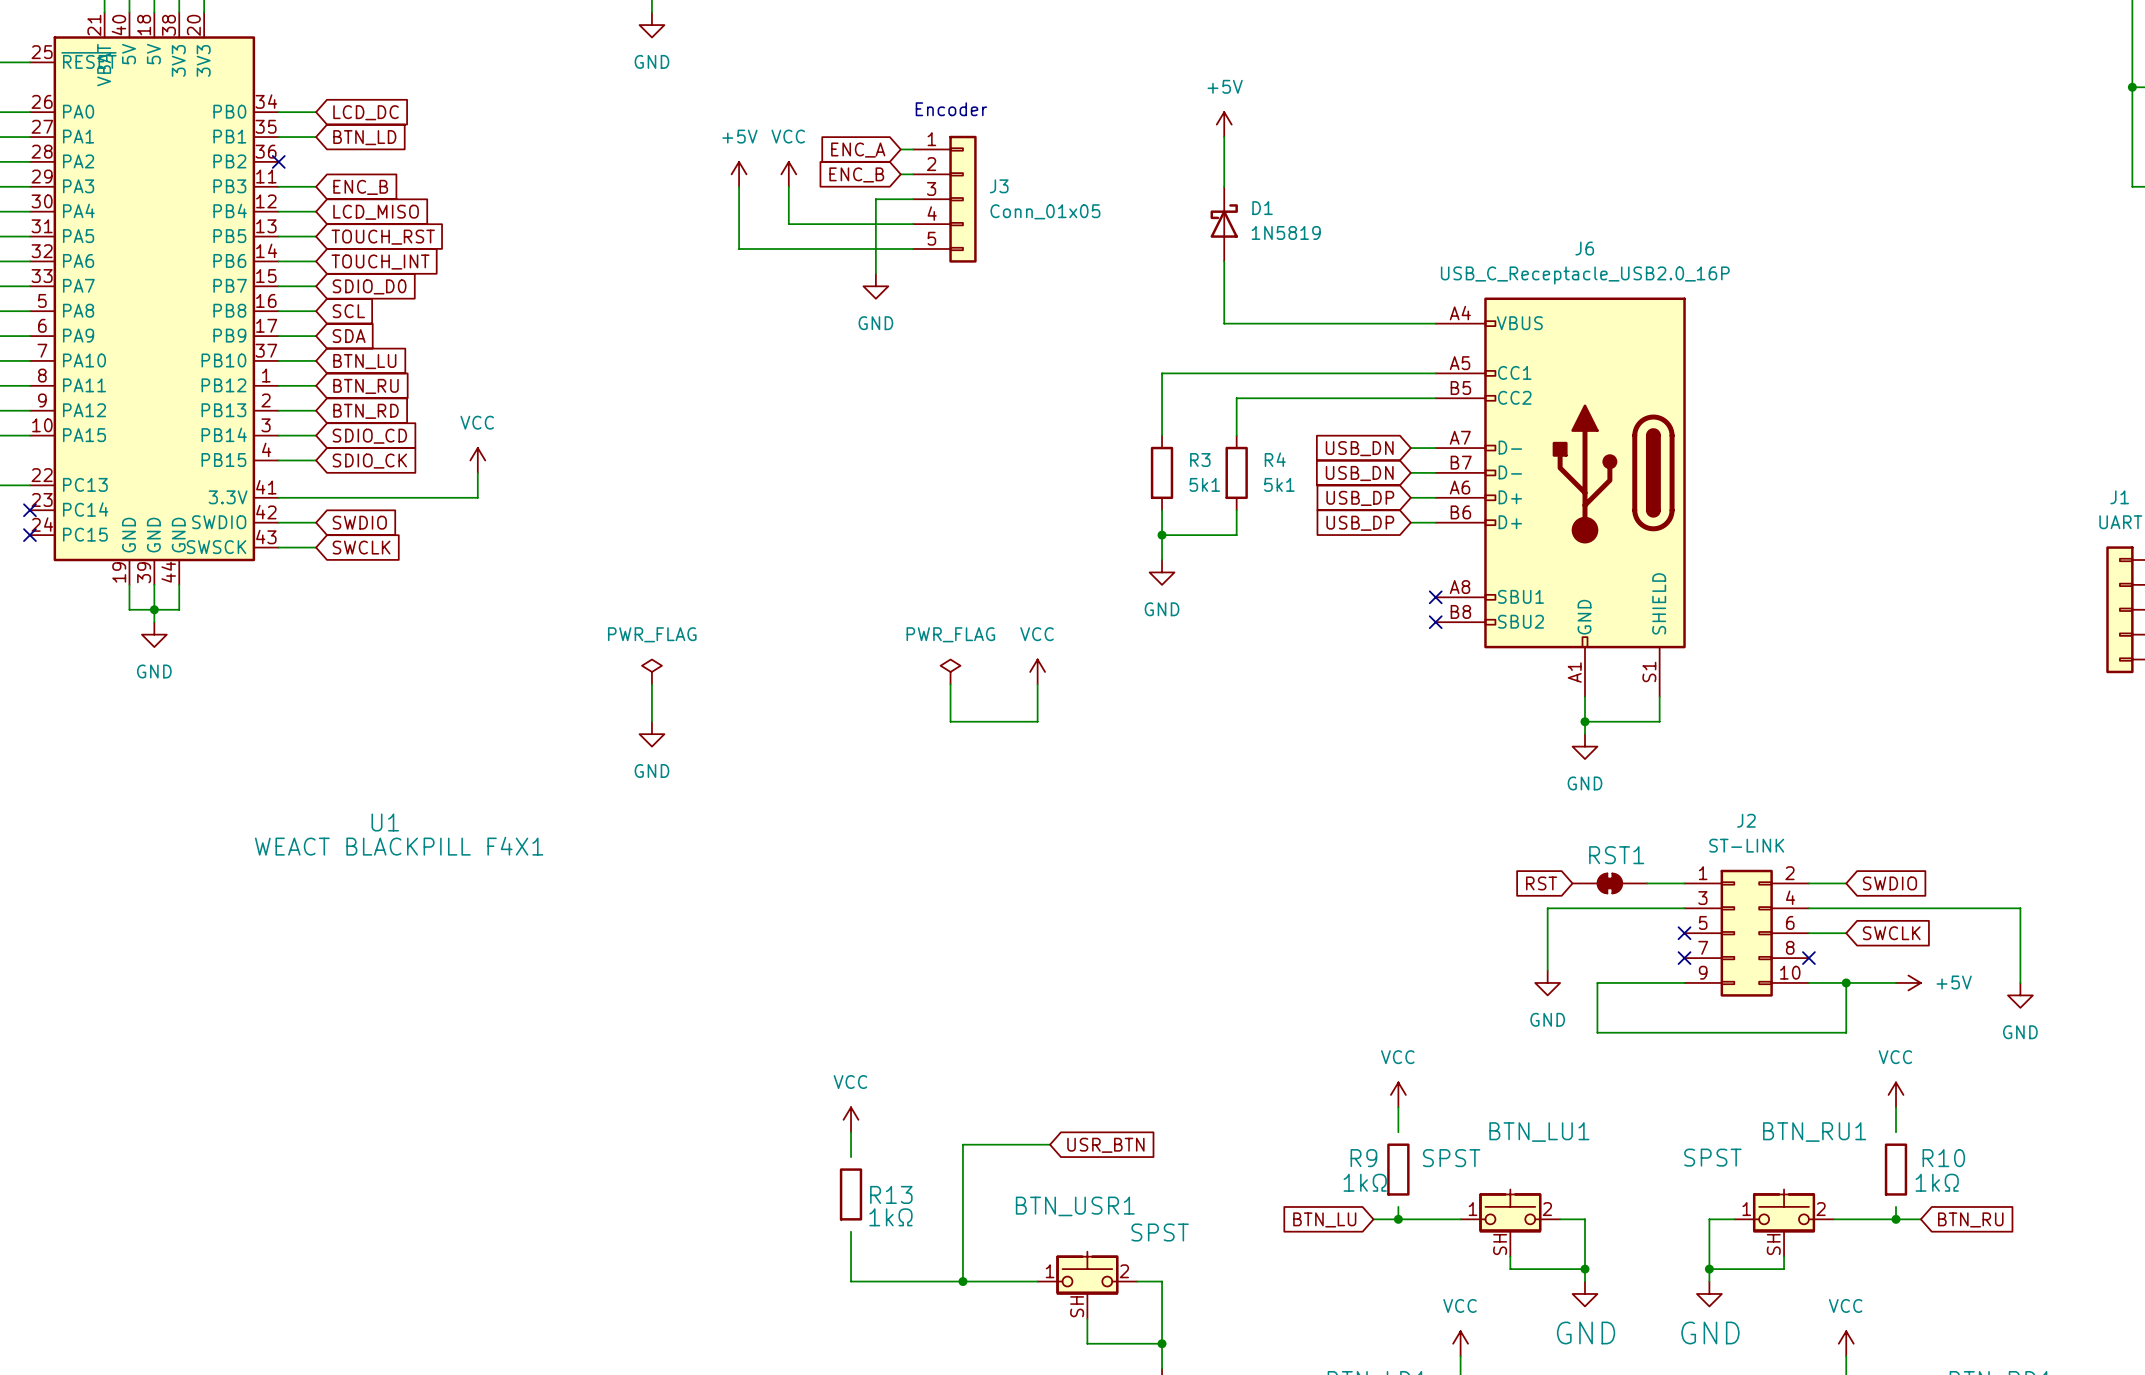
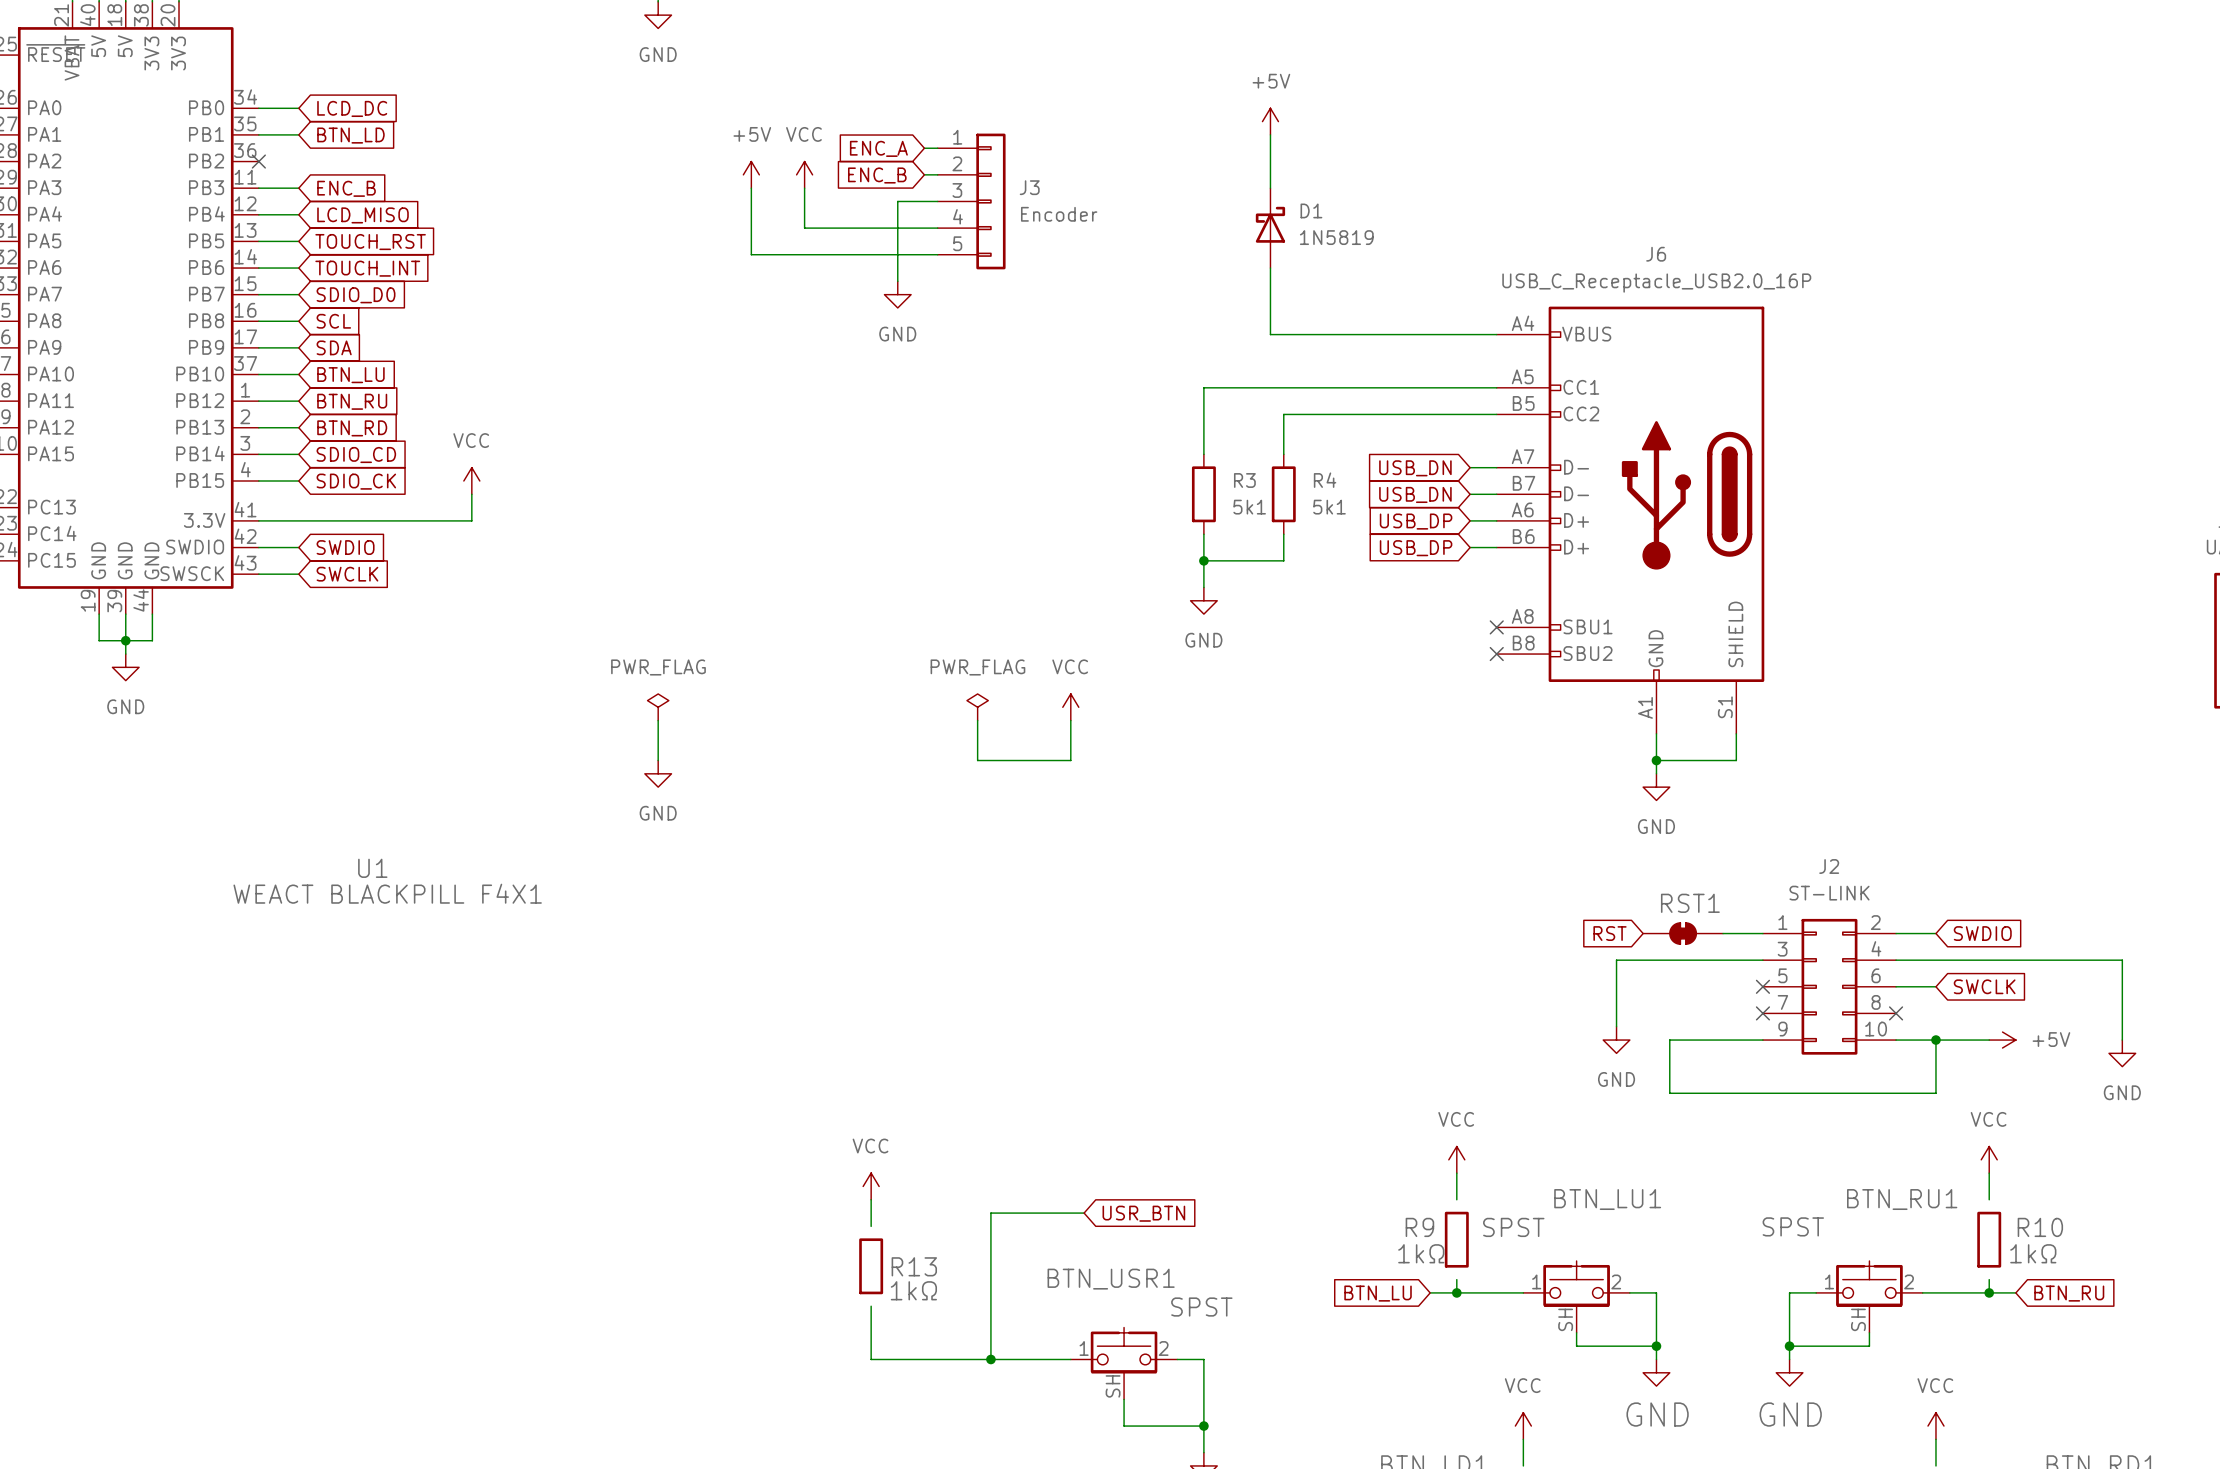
text: Encoder (951, 109) -> none
J3 value: Conn_01x05 (1045, 211) -> Encoder (1059, 214)

